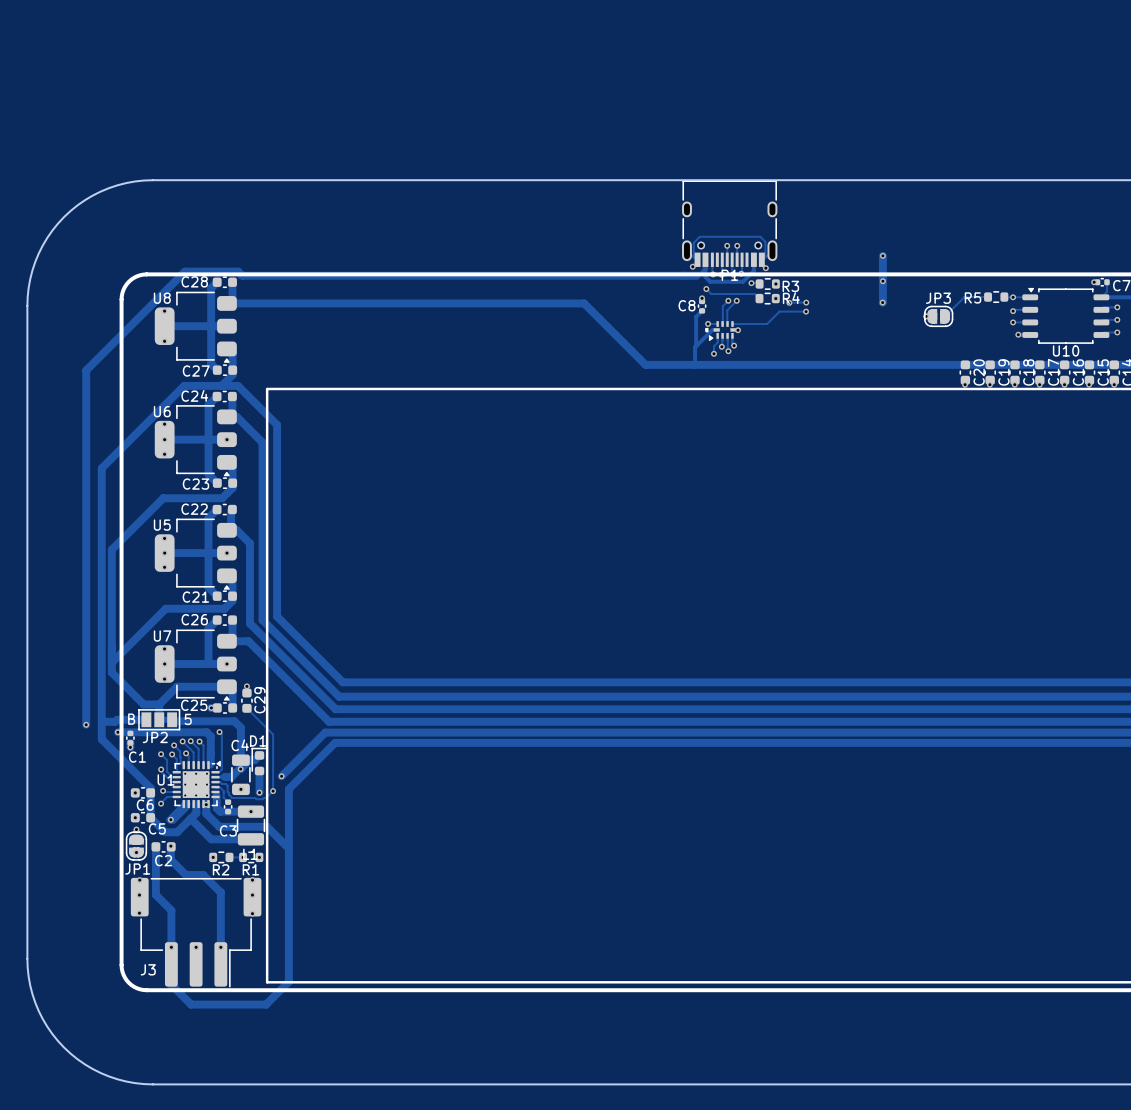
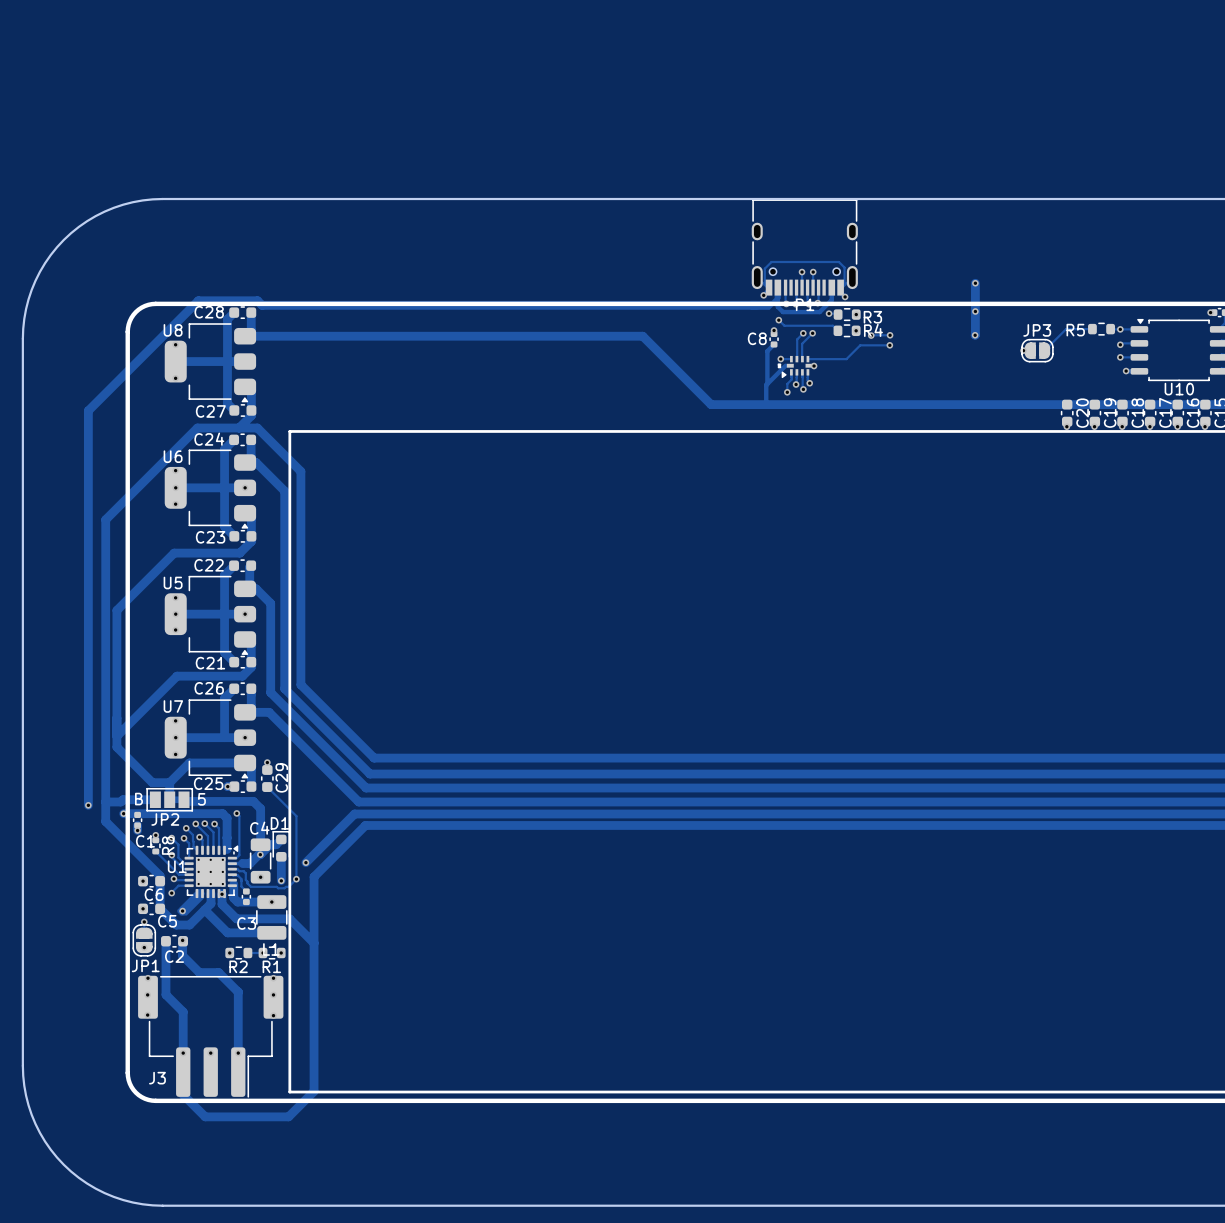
via: none -> (155, 835)
R8: none -> (155, 845)
track: none -> (155, 851) (179, 874) (189, 874)

